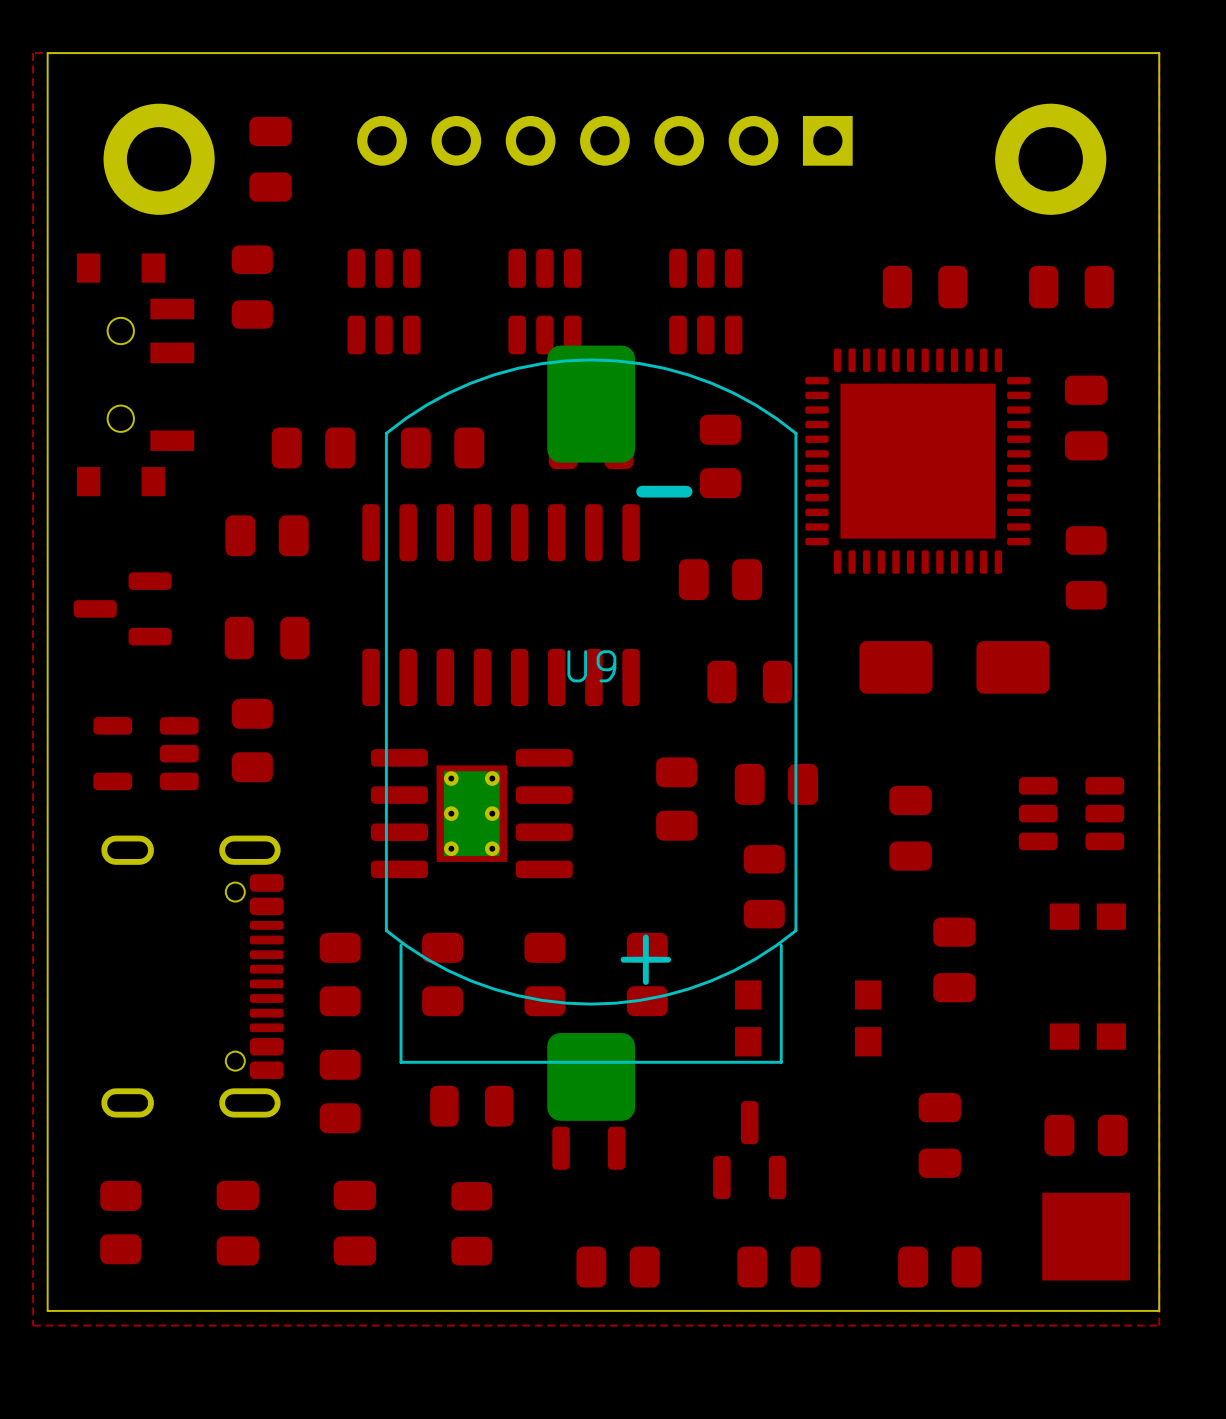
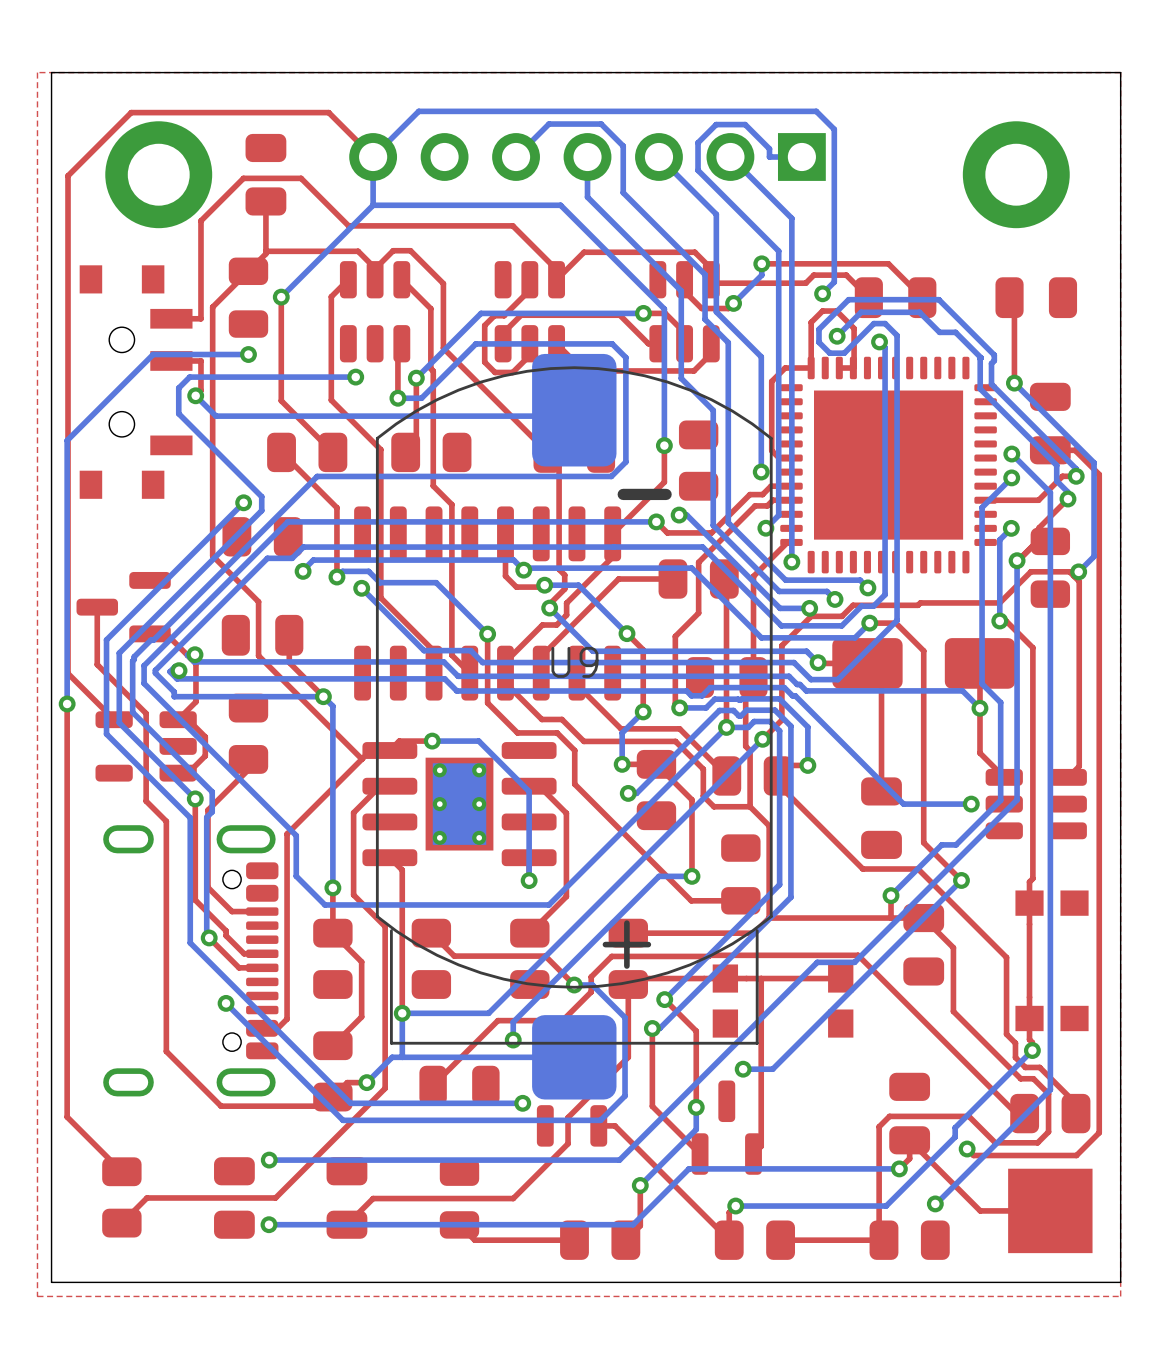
top track: none -> (373, 156) (328, 112) (131, 112) (68, 175) (68, 673) (114, 719)
bottom track: none -> (516, 156) (549, 124) (601, 124) (623, 146) (623, 192) (705, 274) (705, 319) (728, 342) (728, 522) (785, 580) (860, 580) (867, 587)
bottom track: none -> (587, 156) (587, 197) (681, 290) (681, 378) (713, 410) (713, 525) (779, 591) (827, 591) (835, 599)
bottom track: none -> (658, 156) (716, 214) (716, 311) (761, 356) (761, 472)
bottom track: none -> (730, 156) (791, 218) (791, 562)
bottom track: none -> (801, 156) (769, 156) (769, 148) (745, 124) (716, 124) (698, 142) (698, 170) (778, 251) (778, 515) (765, 528)
top track: none -> (265, 201) (265, 253) (212, 307) (212, 555) (258, 601) (258, 655) (361, 759)
bottom track: none -> (373, 205) (373, 156) (418, 111) (816, 111) (834, 129) (834, 282) (822, 293)
bottom track: none -> (373, 205) (281, 297)
bottom track: none -> (373, 205) (560, 205) (664, 309) (664, 445)
top track: none -> (265, 251) (358, 251) (375, 268) (375, 279)
bottom track: none -> (761, 263) (761, 275) (733, 303)
top track: none -> (761, 263) (888, 263) (922, 297)
via: none -> (761, 263)
top track: none -> (375, 268) (393, 250) (410, 250) (443, 283) (443, 348) (559, 463) (559, 569) (564, 575) (564, 589) (549, 604) (549, 608)
top track: none -> (348, 279) (331, 296) (331, 400) (380, 449) (380, 597) (434, 651) (434, 673)
top track: none -> (401, 279) (430, 308) (430, 368) (433, 371) (433, 485) (451, 504) (451, 655) (469, 673)
top track: none -> (529, 279) (529, 290) (504, 315) (494, 315) (484, 325) (484, 362) (495, 372) (512, 372) (529, 355) (529, 343)
top track: none -> (684, 279) (684, 291) (701, 308) (728, 308) (733, 303)
via: none -> (822, 293)
top track: none -> (281, 297) (281, 400) (332, 452)
via: none -> (281, 297)
top track: none -> (868, 297) (846, 275) (813, 275) (805, 283) (714, 283) (711, 279) (711, 268) (694, 252) (584, 252) (556, 279) (556, 269) (512, 225) (348, 225) (301, 178) (243, 178) (200, 220) (200, 318) (171, 318)
top track: none -> (1009, 297) (1014, 302) (1014, 383)
via: none -> (733, 303)
bottom track: none -> (643, 313) (481, 313) (416, 378)
top track: none -> (643, 313) (665, 313) (684, 332) (684, 343)
via: none -> (643, 313)
bottom track: none -> (837, 336) (861, 312) (919, 312) (939, 332) (955, 332) (981, 357) (980, 388) (1056, 465) (1056, 480) (1067, 492) (1067, 499)
via: none -> (837, 336)
bottom track: none -> (879, 341) (885, 347) (885, 594) (873, 606) (861, 606) (841, 625) (781, 625) (702, 547) (303, 547) (292, 558) (267, 558) (155, 670) (155, 673) (174, 692) (174, 696) (323, 696) (332, 706) (332, 887)
via: none -> (879, 341)
top track: none -> (401, 343) (397, 347) (397, 398)
top track: none -> (657, 343) (648, 343) (619, 315) (521, 315) (503, 333) (503, 343)
top track: none -> (711, 343) (711, 353) (693, 370) (583, 370) (556, 343)
bottom track: none -> (248, 354) (153, 354) (67, 440) (67, 703)
via: none -> (248, 354)
top track: none -> (171, 360) (200, 360) (200, 390) (195, 395)
top track: none -> (839, 368) (854, 367) (854, 328) (836, 311) (822, 311) (811, 322) (811, 368) (785, 368) (771, 381) (771, 450) (779, 458) (791, 458)
bottom track: none -> (355, 377) (189, 377) (178, 388) (178, 413) (261, 496) (261, 510) (119, 653) (119, 722) (195, 798)
via: none -> (355, 377)
top track: none -> (416, 378) (416, 441) (405, 452)
via: none -> (416, 378)
bottom track: none -> (1014, 383) (1094, 462) (1094, 556) (1078, 571)
via: none -> (1014, 383)
bottom track: none -> (195, 395) (216, 416) (568, 416) (574, 410)
via: none -> (195, 395)
bottom track: none -> (397, 398) (421, 398) (475, 343) (612, 343) (625, 357) (625, 461) (611, 476) (317, 476) (153, 640) (150, 640) (134, 656) (132, 712) (212, 791) (212, 811) (206, 817) (206, 935) (209, 937)
via: none -> (397, 398)
top track: none -> (664, 445) (664, 482) (612, 533) (612, 557) (566, 603) (566, 615) (556, 625) (542, 625) (505, 661) (505, 683) (541, 719) (561, 719) (583, 741) (675, 741) (703, 769) (703, 796) (713, 806) (750, 806)
via: none -> (664, 445)
top track: none -> (1050, 450) (1075, 450) (1099, 474) (1099, 1132) (1076, 1155) (973, 1155) (967, 1149)
top track: none -> (281, 452) (336, 507) (336, 577)
bottom track: none -> (1011, 454) (1050, 492) (1050, 1089) (935, 1203)
via: none -> (1011, 454)
via: none -> (761, 472)
bottom track: none -> (1076, 476) (1076, 468) (991, 384) (991, 363) (994, 360) (994, 355) (938, 299) (848, 299) (818, 329) (818, 342) (829, 353) (844, 353) (873, 323) (885, 323) (897, 335) (897, 620) (837, 679) (811, 679) (794, 662) (482, 662) (470, 650) (424, 650) (361, 588)
top track: none -> (1076, 476) (1062, 476) (1038, 500) (985, 500)
via: none -> (1076, 476)
bottom track: none -> (1011, 477) (982, 507) (982, 683) (1000, 702) (1000, 800) (956, 844) (941, 844) (891, 895)
via: none -> (1011, 477)
top track: none -> (791, 486) (771, 486) (762, 494) (749, 494) (711, 532) (667, 532) (656, 521)
top track: none -> (1067, 499) (1039, 527) (1039, 539) (1017, 560)
via: none -> (1067, 499)
top track: none -> (791, 500) (772, 500) (767, 505) (755, 505) (698, 562) (698, 613) (675, 636) (675, 703) (679, 707)
bottom track: none -> (243, 502) (106, 639) (106, 734) (190, 817) (190, 942) (350, 1103) (522, 1103)
via: none -> (243, 502)
bottom track: none -> (679, 515) (686, 515) (780, 608) (809, 608)
via: none -> (679, 515)
bottom track: none -> (656, 521) (287, 521) (144, 665) (144, 683) (296, 835) (296, 876) (324, 904) (548, 904) (726, 727) (748, 727) (754, 721) (770, 721) (779, 730) (779, 884) (664, 999)
via: none -> (656, 521)
via: none -> (765, 528)
bottom track: none -> (1011, 528) (999, 539) (999, 621)
via: none -> (1011, 528)
top track: none -> (505, 533) (505, 576) (516, 587) (542, 587) (544, 585)
top track: none -> (791, 542) (787, 542) (753, 576) (753, 677) (745, 685) (745, 746) (750, 750) (750, 806)
bottom track: none -> (1017, 560) (1017, 799) (854, 962) (817, 962) (619, 1160) (269, 1160)
via: none -> (1017, 560)
via: none -> (791, 562)
via: none -> (523, 570)
bottom track: none -> (303, 571) (313, 560) (513, 560) (523, 570) (525, 568) (691, 568) (761, 637) (854, 637) (869, 623)
via: none -> (303, 571)
via: none -> (1078, 571)
bottom track: none -> (336, 577) (342, 571) (368, 571) (380, 582) (436, 582) (487, 634)
via: none -> (336, 577)
top track: none -> (672, 579) (618, 579) (541, 656) (541, 673)
top track: none -> (724, 579) (726, 581) (726, 727)
bottom track: none -> (544, 585) (578, 585) (627, 633)
via: none -> (544, 585)
via: none -> (867, 587)
via: none -> (361, 588)
via: none -> (835, 599)
top track: none -> (97, 607) (97, 664) (146, 713) (146, 801) (166, 821) (166, 1051) (221, 1106) (323, 1106) (347, 1082) (366, 1082)
bottom track: none -> (549, 608) (592, 651) (806, 651) (818, 662)
via: none -> (549, 608)
via: none -> (809, 608)
top track: none -> (811, 616) (842, 616) (853, 605) (999, 602) (1030, 571) (1069, 571) (1079, 581) (1079, 766) (1068, 777)
top track: none -> (811, 616) (781, 645) (781, 720) (762, 739)
top track: none -> (999, 621) (1006, 621) (1032, 647) (1032, 878) (1029, 881) (1029, 1039) (1032, 1042) (1032, 1050)
via: none -> (999, 621)
top track: none -> (869, 623) (895, 623) (923, 650) (923, 842) (961, 880)
via: none -> (869, 623)
top track: none -> (150, 633) (166, 633) (195, 663) (195, 701) (178, 719) (188, 719) (205, 736) (205, 755) (188, 773) (178, 773)
top track: none -> (487, 634) (487, 703) (517, 732) (557, 732) (574, 750) (574, 784) (691, 900) (740, 900)
via: none -> (487, 634)
top track: none -> (627, 633) (643, 649) (643, 711)
via: none -> (627, 633)
top track: none -> (289, 635) (289, 662) (323, 696)
bottom track: none -> (194, 654) (191, 651) (187, 655) (194, 661) (443, 661) (458, 676) (789, 676) (806, 690) (962, 690) (979, 708)
via: none -> (194, 654)
top track: none -> (818, 662) (867, 663) (881, 677) (881, 791)
via: none -> (818, 662)
top track: none -> (979, 663) (979, 753) (1004, 777)
bottom track: none -> (179, 670) (175, 666) (169, 671) (177, 678) (444, 678) (456, 691) (686, 691) (691, 695) (702, 695) (710, 687) (784, 687) (792, 695) (795, 695) (903, 804) (971, 804)
via: none -> (179, 670)
top track: none -> (576, 673) (576, 684) (620, 728) (679, 728) (726, 775)
via: none -> (323, 696)
top track: none -> (67, 703) (67, 1117) (121, 1171)
via: none -> (67, 703)
bottom track: none -> (679, 707) (706, 707) (714, 699) (779, 698) (807, 727) (807, 765)
via: none -> (679, 707)
via: none -> (979, 708)
bottom track: none -> (643, 711) (622, 732) (622, 764)
via: none -> (643, 711)
via: none -> (726, 727)
bottom track: none -> (762, 739) (488, 1013) (402, 1013) (402, 1057)
via: none -> (762, 739)
bottom track: none -> (432, 741) (478, 741) (529, 791) (529, 880)
top track: none -> (432, 741) (399, 741) (389, 750) (370, 750) (287, 834) (287, 1019) (277, 1028) (262, 1028)
via: none -> (432, 741)
top track: none -> (248, 759) (248, 769) (207, 810) (207, 887) (232, 911) (262, 911)
top track: none -> (622, 764) (656, 764) (691, 799) (691, 876)
via: none -> (622, 764)
top track: none -> (807, 765) (788, 765) (778, 775) (778, 784) (862, 869) (918, 869) (1006, 957) (1006, 1034) (1015, 1043) (1015, 1057) (1025, 1067) (1039, 1067) (1076, 1103) (1076, 1113)
via: none -> (807, 765)
top track: none -> (389, 786) (380, 786) (353, 812) (353, 894) (385, 926) (385, 1088) (275, 1197) (146, 1197) (121, 1223)
top track: none -> (529, 786) (539, 786) (566, 813) (566, 896) (529, 933)
bottom track: none -> (628, 793) (636, 793) (719, 710) (733, 710) (741, 715) (746, 710) (774, 710) (790, 726) (790, 897) (659, 1028) (652, 1028)
via: none -> (628, 793)
top track: none -> (195, 798) (195, 900) (226, 930) (226, 935) (244, 953) (262, 953)
via: none -> (195, 798)
via: none -> (971, 804)
top track: none -> (750, 806) (769, 825) (769, 918)
top track: none -> (389, 857) (402, 870) (402, 1013)
bottom track: none -> (691, 876) (658, 876) (513, 1022) (513, 1040)
via: none -> (691, 876)
via: none -> (529, 880)
bottom track: none -> (961, 880) (772, 1069) (743, 1069)
via: none -> (961, 880)
top track: none -> (332, 887) (332, 933) (361, 961) (361, 1016) (332, 1045)
via: none -> (332, 887)
top track: none -> (891, 895) (891, 918)
via: none -> (891, 895)
top track: none -> (769, 918) (923, 918) (953, 947) (953, 1011) (1020, 1078) (1033, 1078) (1048, 1093) (1048, 1131) (1037, 1142) (995, 1142) (968, 1116) (889, 1116) (879, 1126) (879, 1240)
top track: none -> (769, 918) (754, 933) (628, 933)
top track: none -> (431, 933) (454, 956) (545, 956) (574, 985)
top track: none -> (209, 937) (239, 967) (262, 967)
via: none -> (209, 937)
top track: none -> (761, 978) (761, 1146) (753, 1154)
top track: none -> (840, 978) (634, 978) (628, 984) (628, 1057) (568, 1117) (568, 1143) (513, 1198) (373, 1198) (346, 1224)
bottom track: none -> (574, 985) (592, 985) (625, 1017) (625, 1095) (600, 1120) (343, 1120) (226, 1003)
via: none -> (574, 985)
top track: none -> (664, 999) (696, 1031) (696, 1107)
via: none -> (664, 999)
via: none -> (226, 1003)
via: none -> (402, 1013)
top track: none -> (652, 1028) (652, 1106) (700, 1154)
via: none -> (652, 1028)
via: none -> (513, 1040)
bottom track: none -> (1032, 1050) (955, 1127) (955, 1137) (886, 1206) (735, 1206)
via: none -> (1032, 1050)
bottom track: none -> (574, 1057) (392, 1057) (366, 1082)
via: none -> (743, 1069)
via: none -> (366, 1082)
top track: none -> (433, 1085) (497, 1020) (562, 1020) (591, 992) (591, 976) (611, 956) (858, 955) (1016, 1113) (1024, 1113)
via: none -> (522, 1103)
bottom track: none -> (696, 1107) (696, 1129) (640, 1185)
via: none -> (696, 1107)
top track: none -> (598, 1125) (614, 1125) (729, 1240) (729, 1212) (735, 1206)
via: none -> (967, 1149)
via: none -> (269, 1160)
bottom track: none -> (899, 1168) (688, 1168) (633, 1224) (268, 1224)
top track: none -> (899, 1168) (909, 1158) (909, 1140) (980, 1210) (1050, 1210)
via: none -> (899, 1168)
top track: none -> (640, 1185) (640, 1225) (625, 1240)
via: none -> (640, 1185)
via: none -> (935, 1203)
via: none -> (735, 1206)
via: none -> (268, 1224)
top track: none -> (459, 1224) (474, 1240) (574, 1240)
top track: none -> (883, 1240) (780, 1240)

